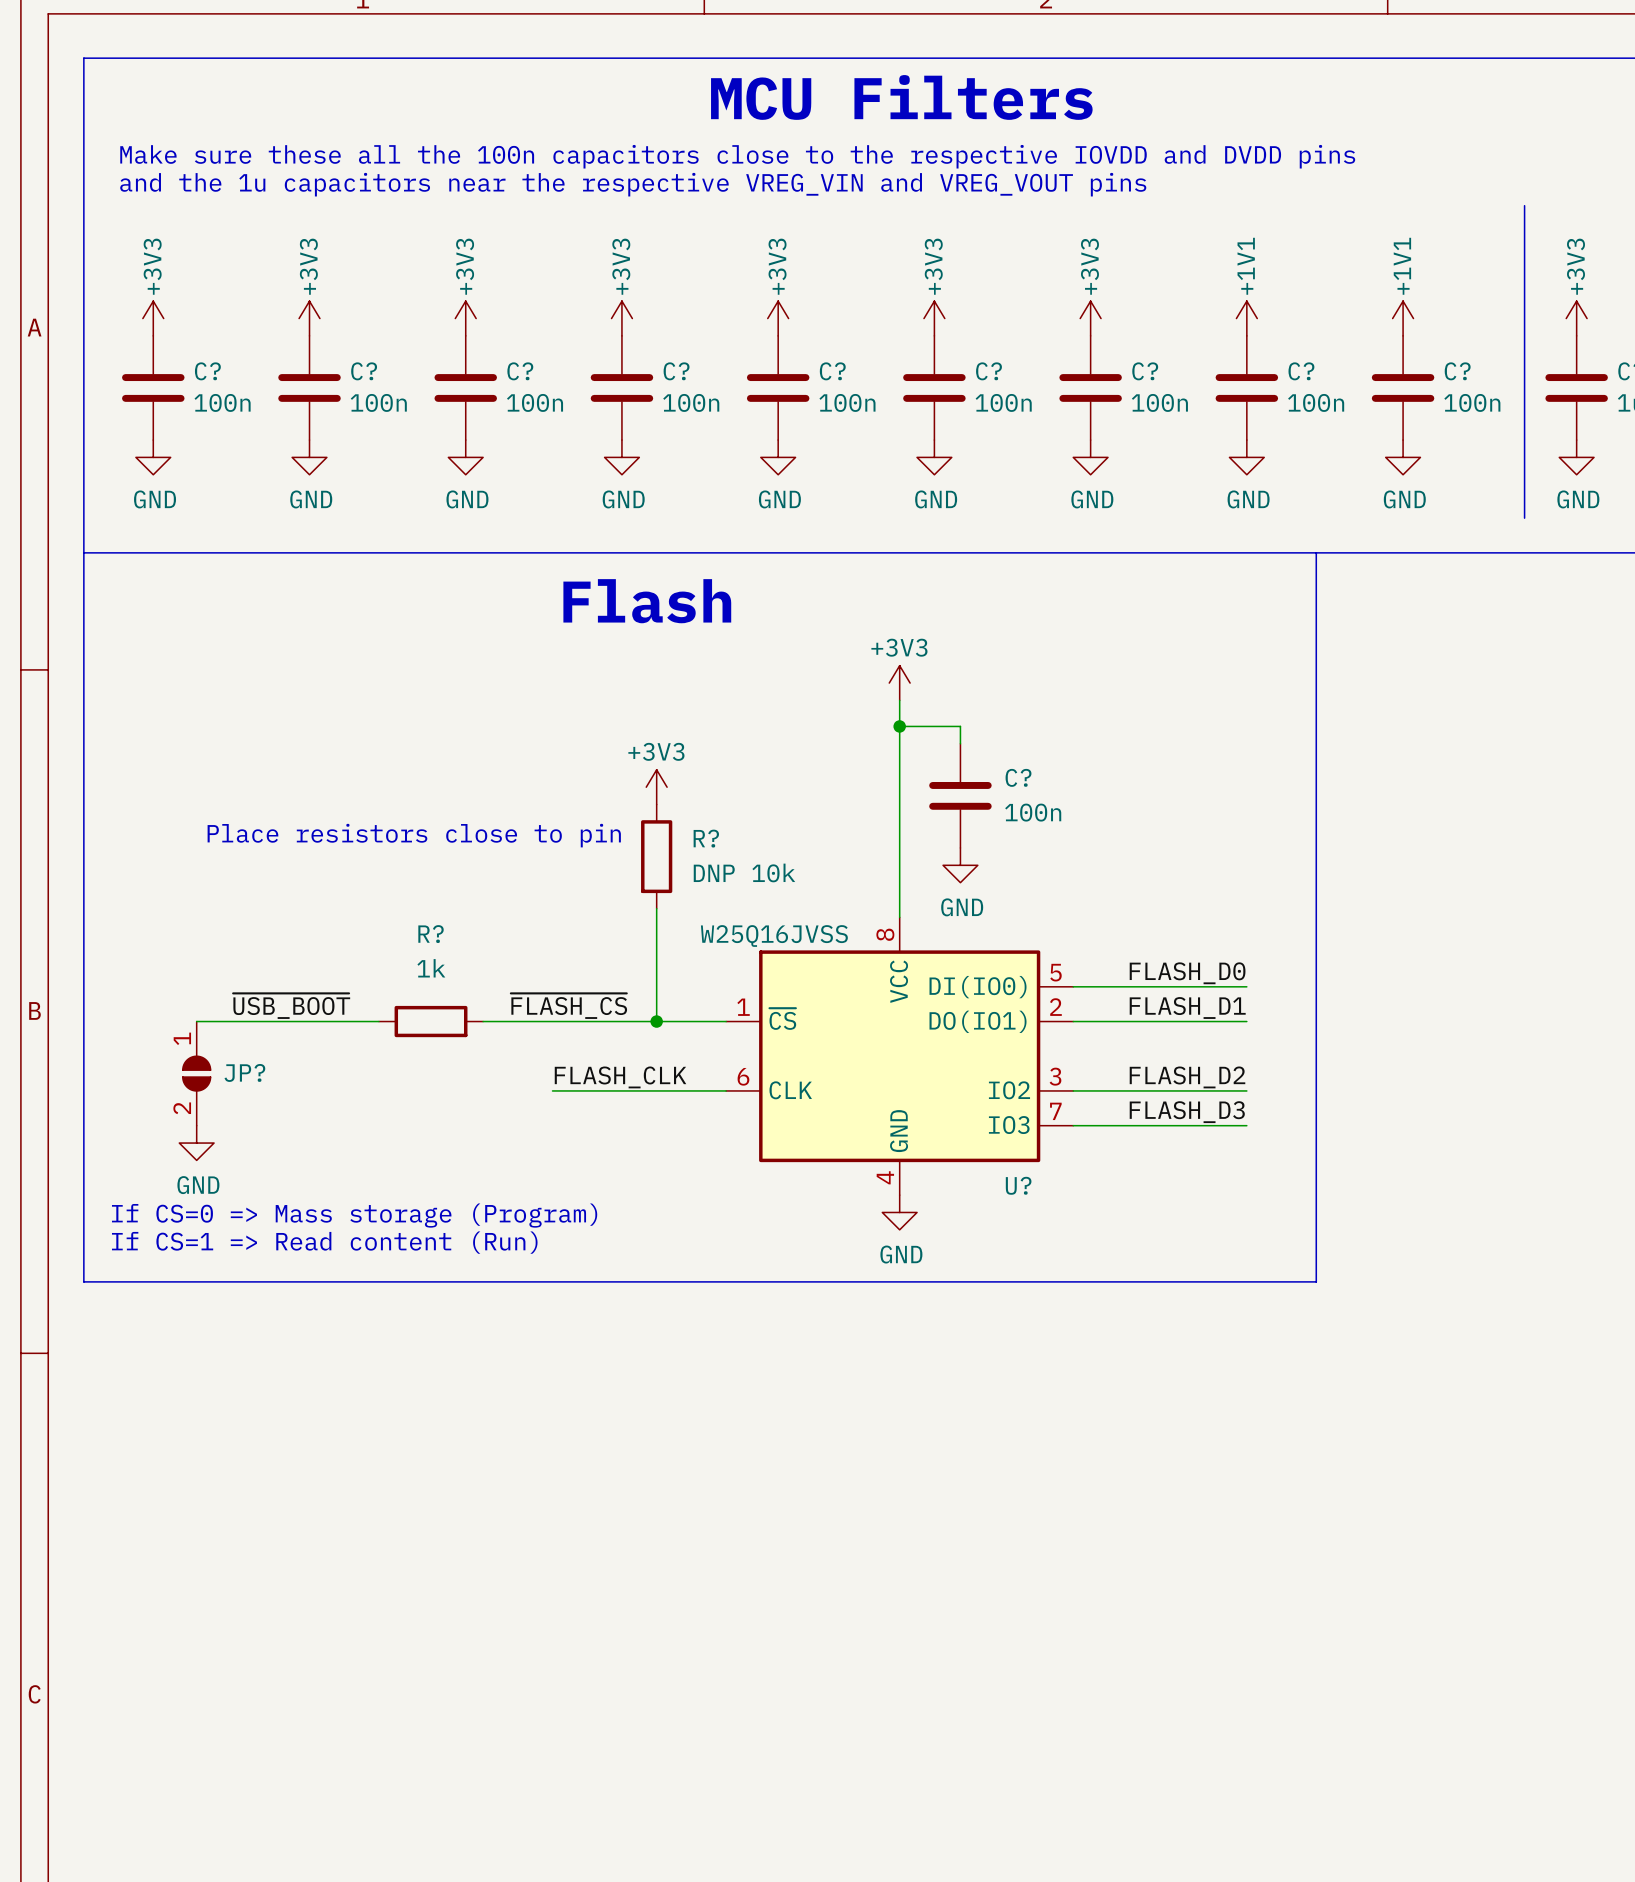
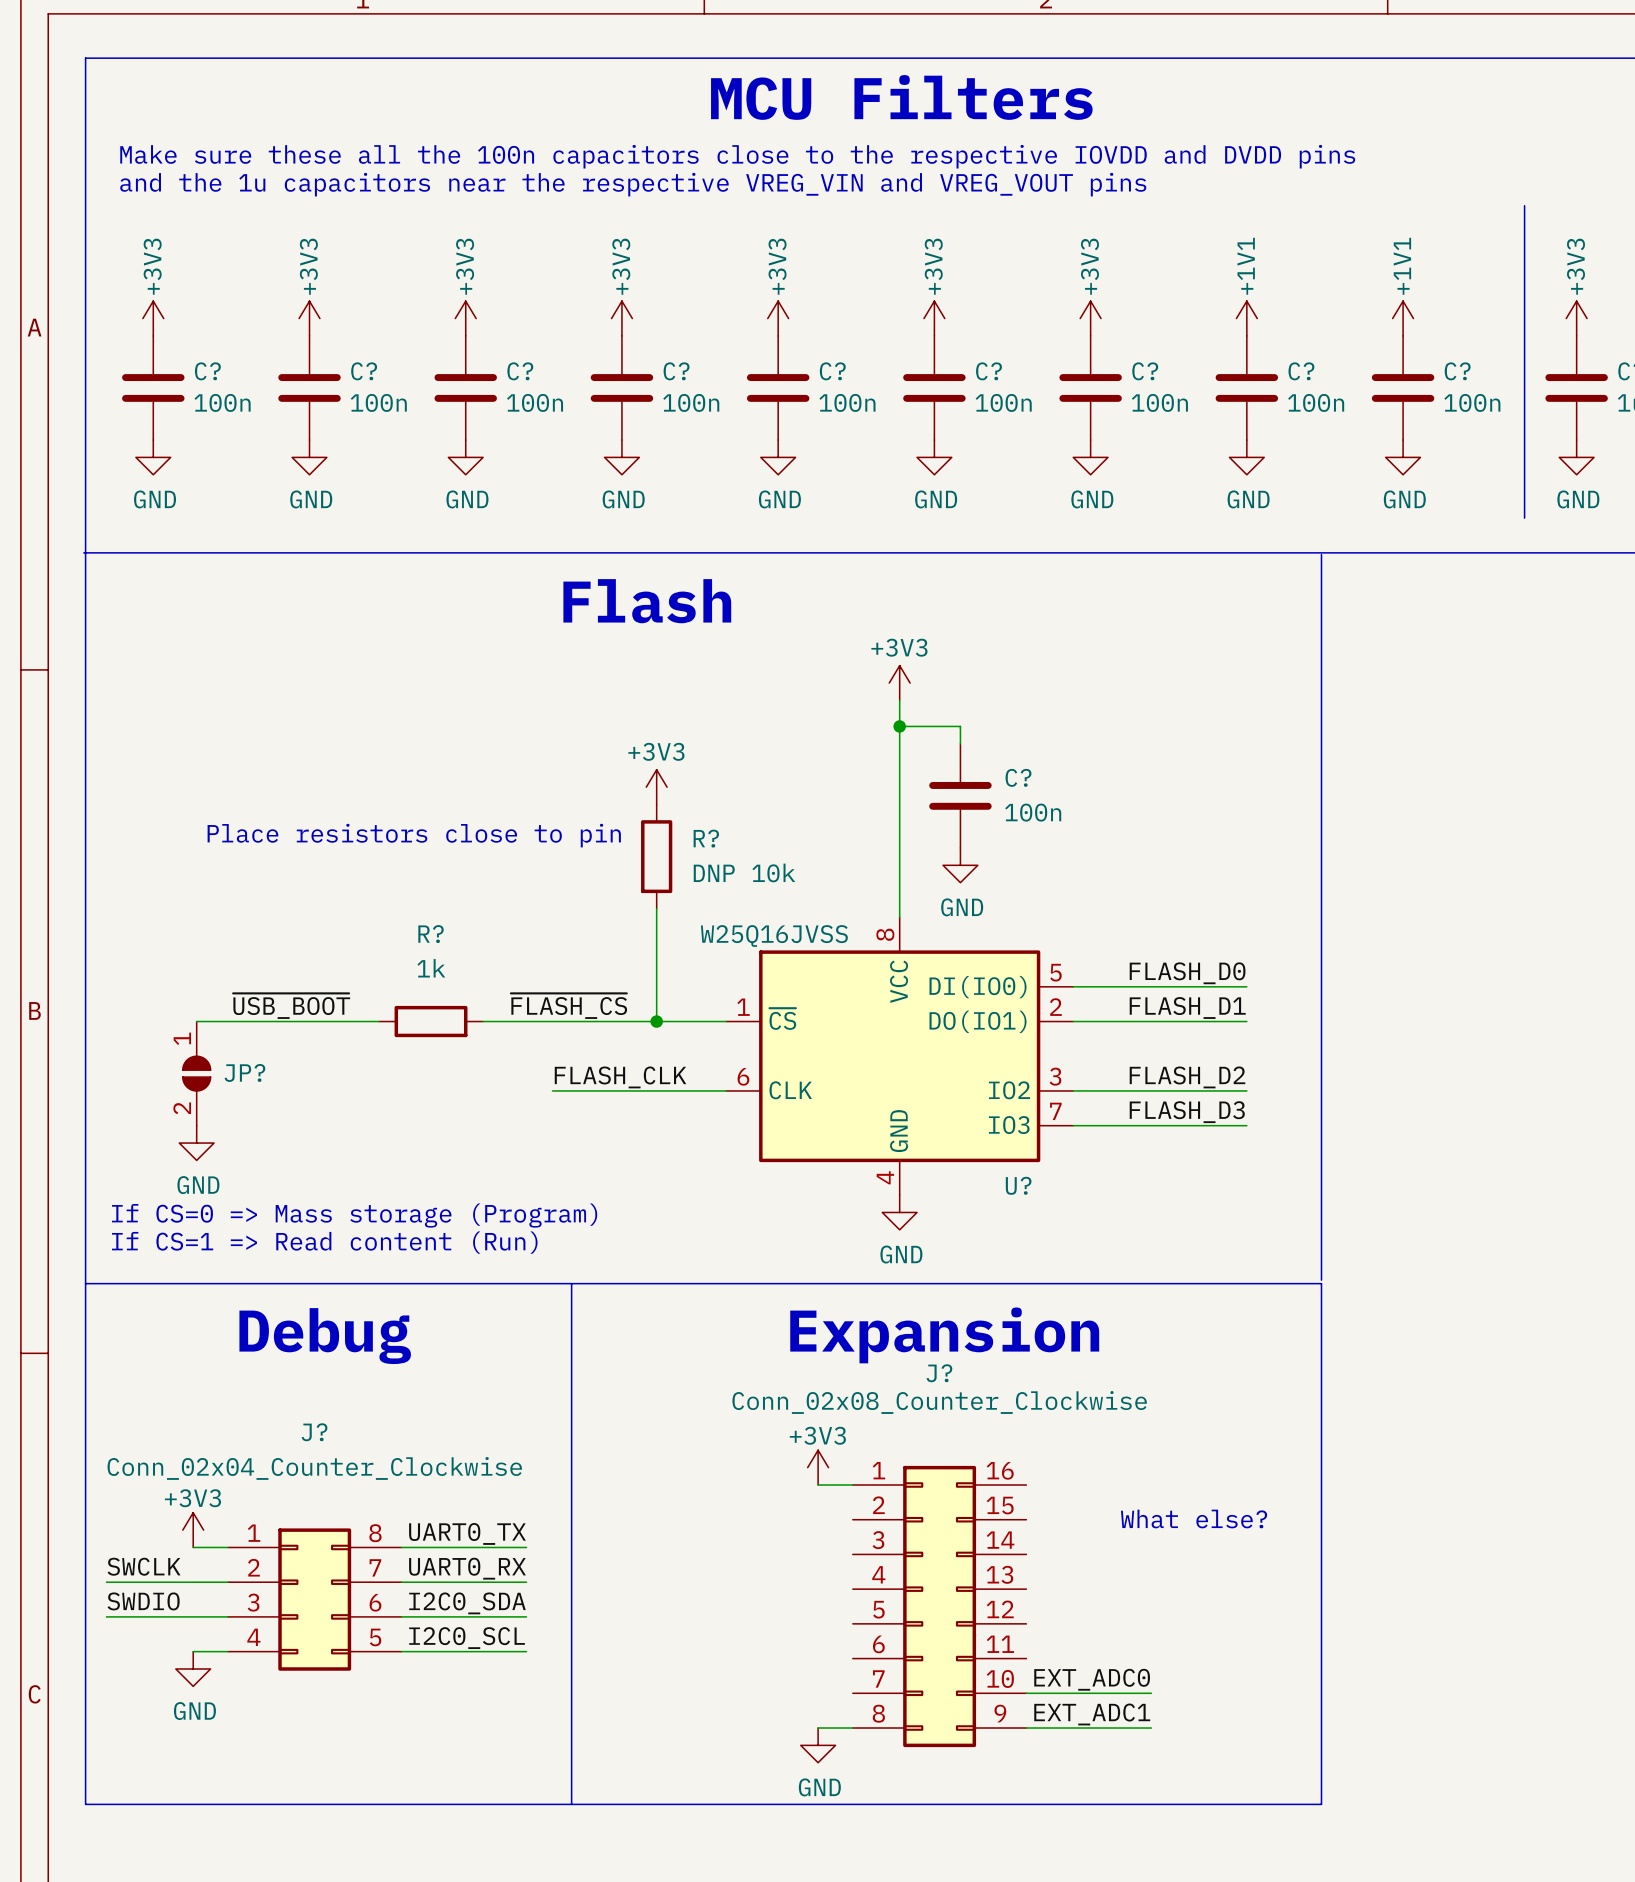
line: (85, 58) (83, 58) (83, 1281) (1316, 1281) (1316, 552) -> (85, 58) (85, 1804) (1321, 1804) (1321, 1283) (85, 1283)
line: none -> (1321, 554) (1321, 1280)
line: none -> (571, 1283) (571, 1804)
text: none -> Expansion (944, 1335)
text: none -> Debug (325, 1336)
power symbol: none -> +3V3 (818, 1467)
wire: none -> (818, 1485) (852, 1485)
text: none -> What else? (1194, 1519)
power symbol: none -> +3V3 (193, 1530)
label: none -> UART0_TX (467, 1533)
wire: none -> (193, 1547) (227, 1547)
wire: none -> (401, 1547) (526, 1547)
label: none -> SWCLK (144, 1566)
label: none -> UART0_RX (467, 1568)
wire: none -> (106, 1582) (227, 1582)
wire: none -> (401, 1582) (526, 1582)
J?: none -> Conn_02x04_Counter_Clockwise (314, 1599)
label: none -> SWDIO (143, 1601)
label: none -> I2C0_SDA (467, 1603)
J?: none -> Conn_02x08_Counter_Clockwise (939, 1606)
wire: none -> (106, 1616) (227, 1616)
wire: none -> (401, 1616) (526, 1616)
label: none -> I2C0_SCL (467, 1638)
wire: none -> (193, 1651) (227, 1651)
wire: none -> (401, 1651) (526, 1651)
power symbol: none -> GND (193, 1668)
label: none -> EXT_ADC0 (1092, 1679)
wire: none -> (1026, 1693) (1151, 1693)
label: none -> EXT_ADC1 (1092, 1714)
wire: none -> (818, 1728) (852, 1728)
wire: none -> (1026, 1728) (1151, 1728)
power symbol: none -> GND (818, 1745)

